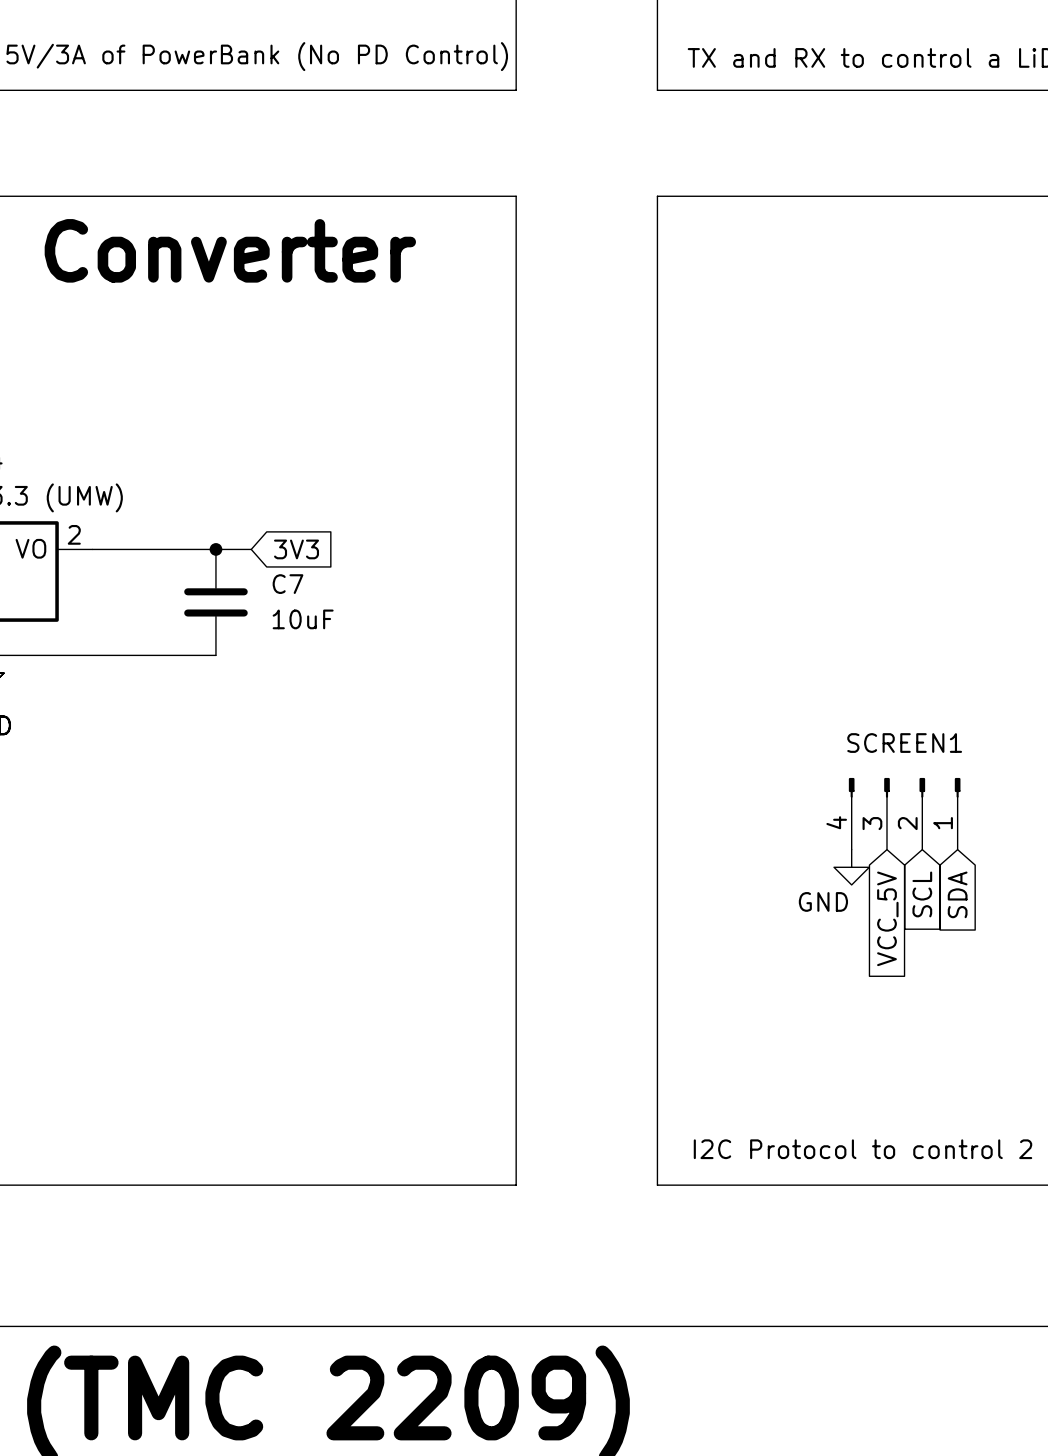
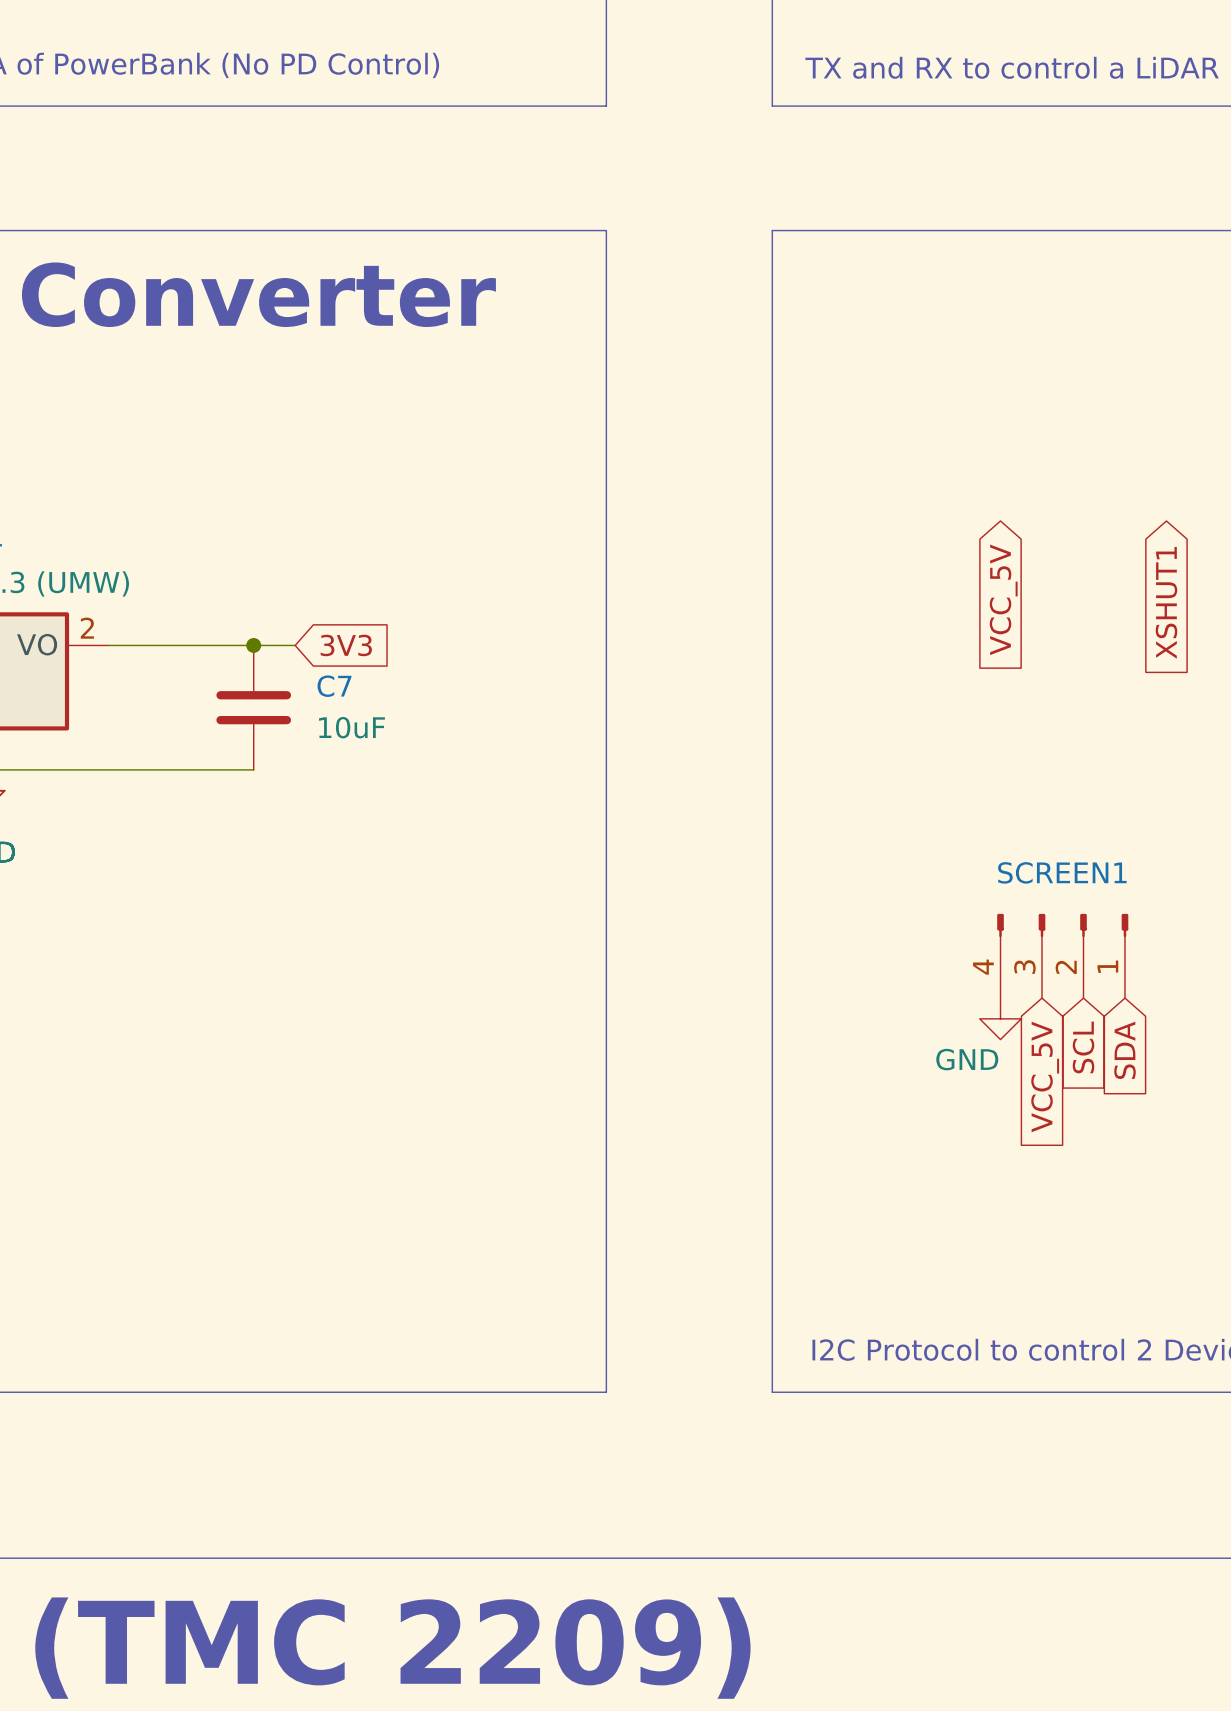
global label: none -> VCC_5V (1003, 599)
global label: none -> XSHUT1 (1166, 602)

